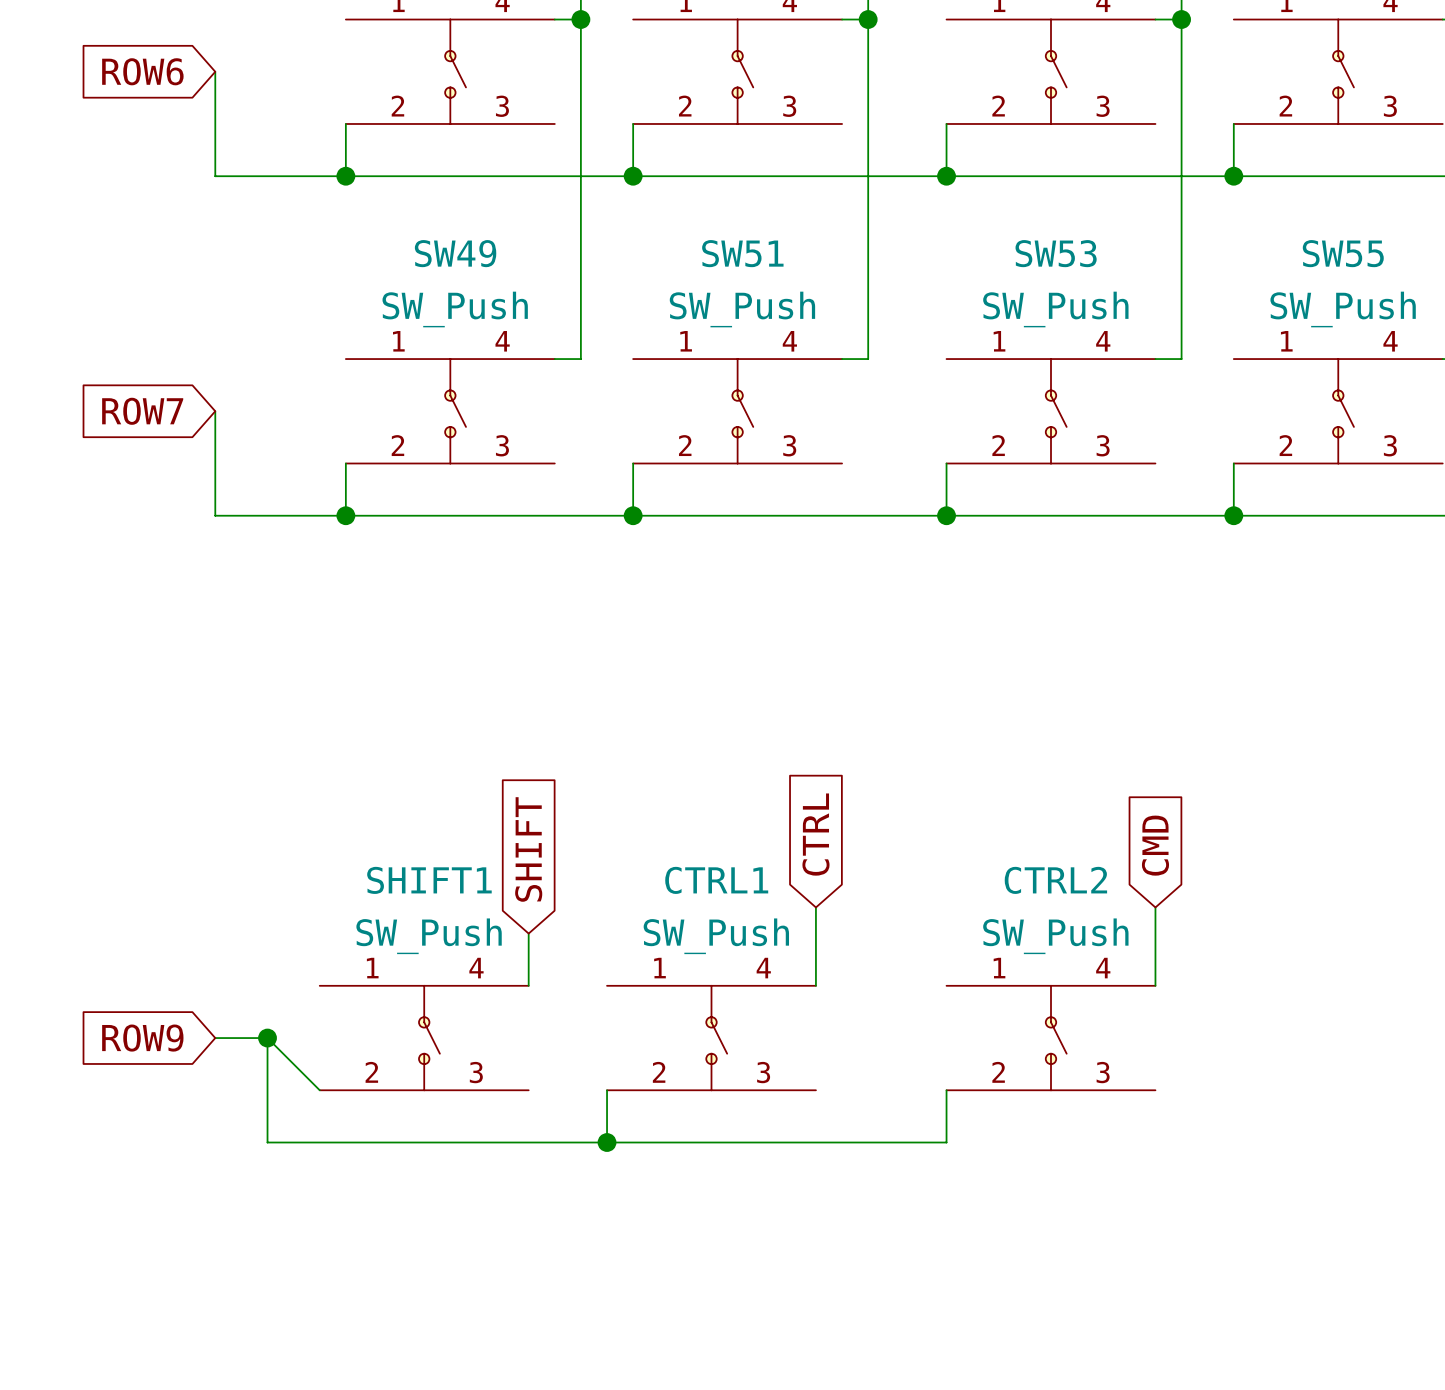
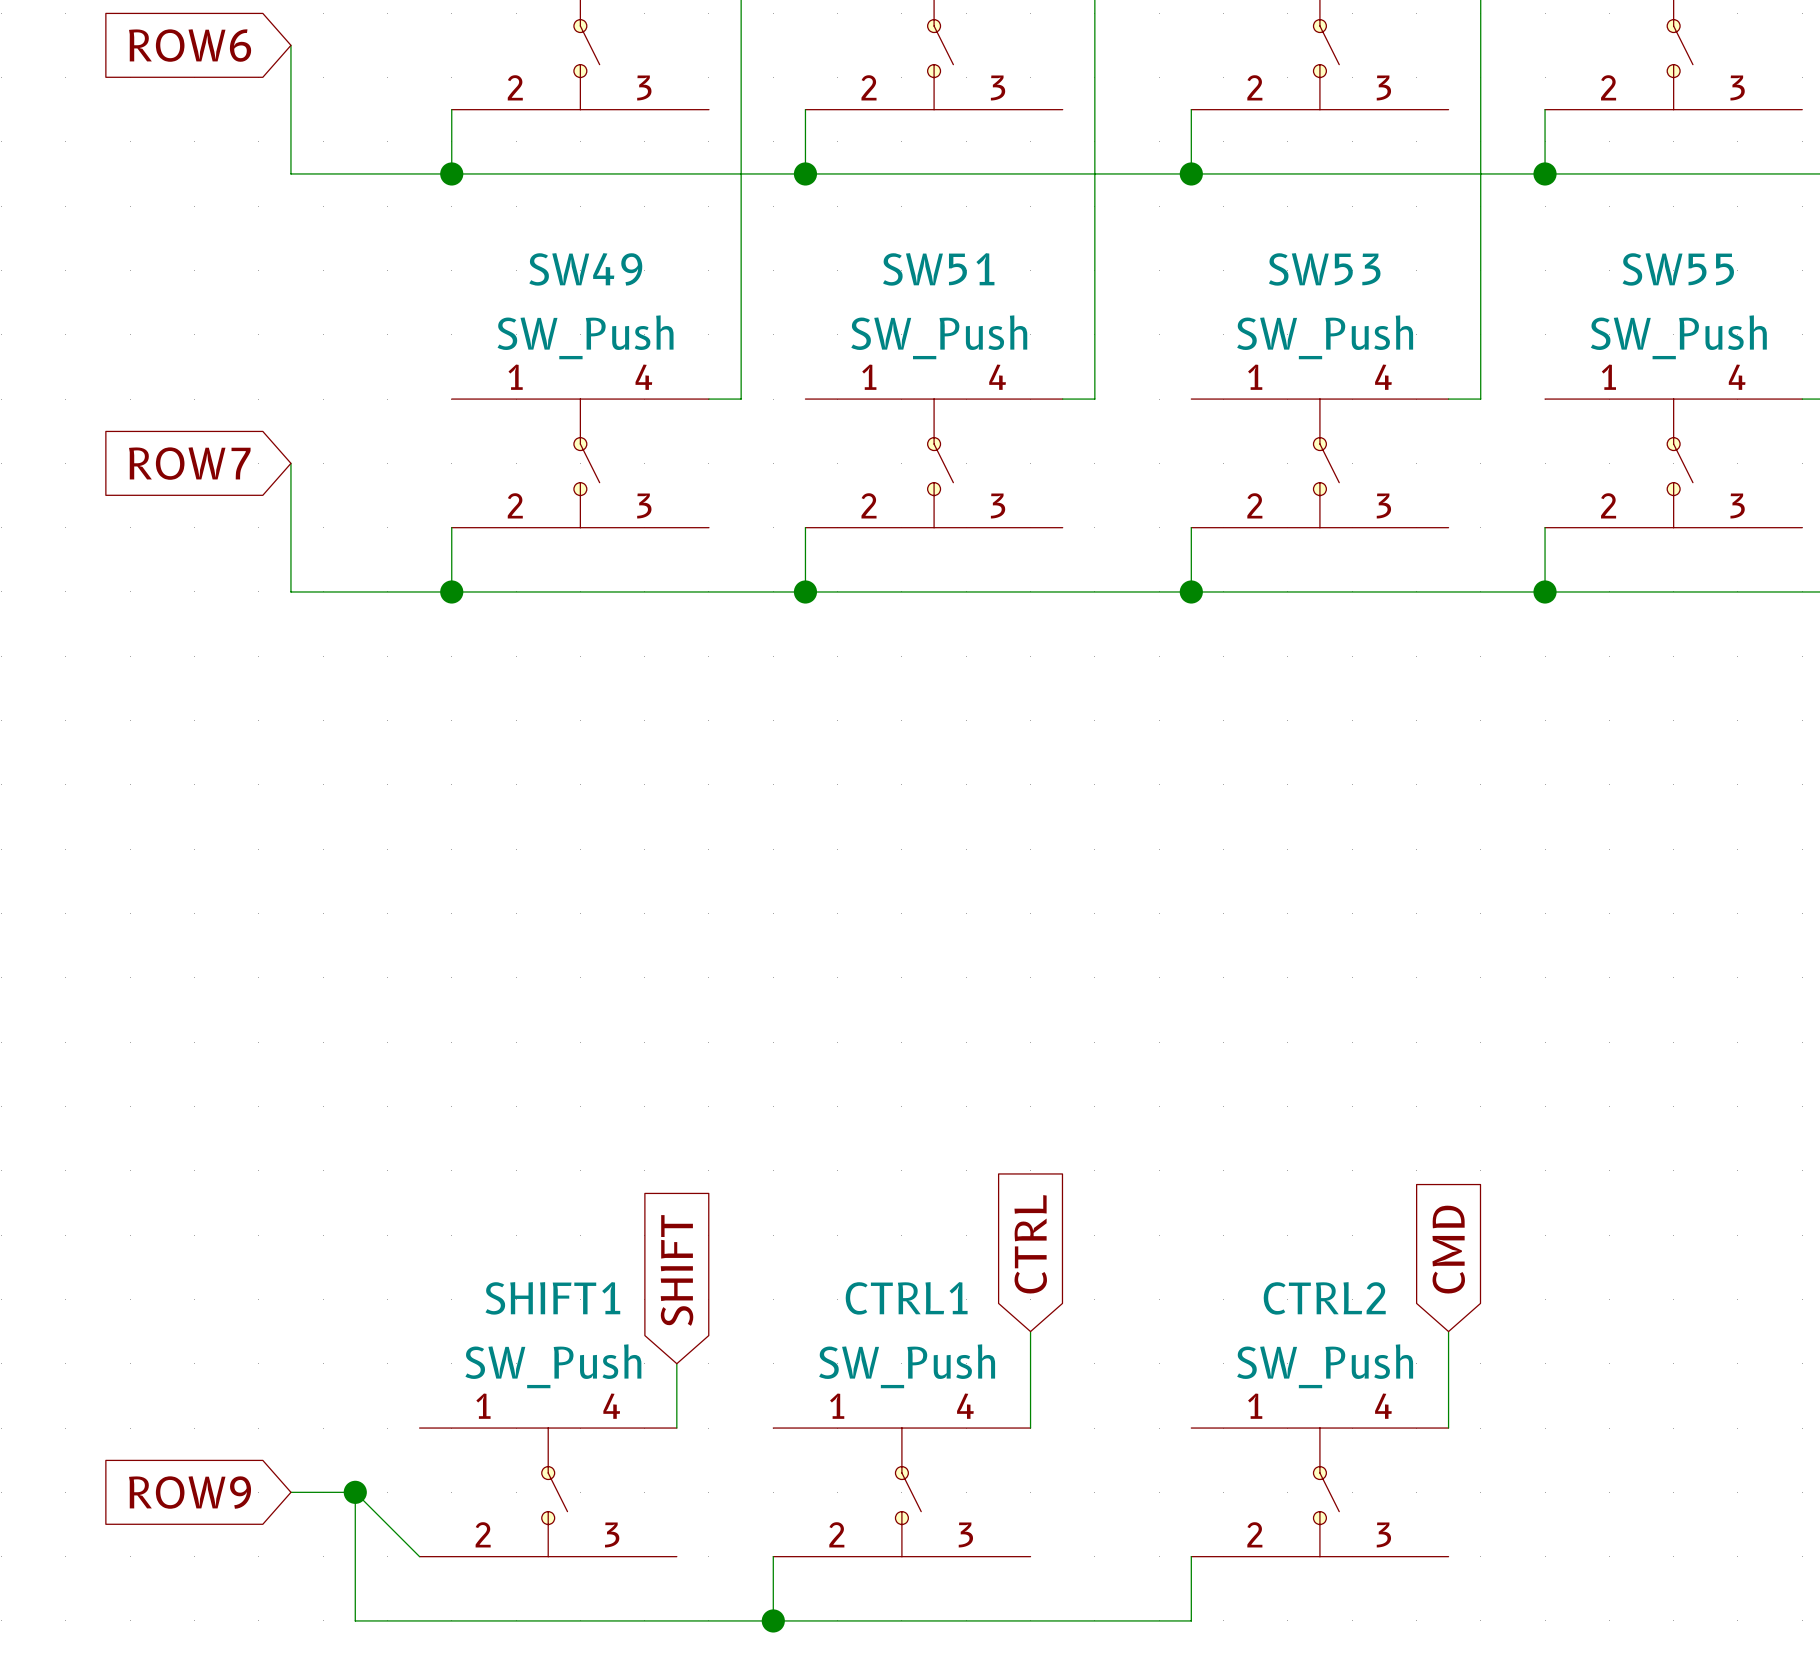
global label position: CTRL (815, 834) -> CTRL (1030, 1244)
global label position: CMD (1155, 845) -> CMD (1448, 1249)
global label position: SHIFT (528, 849) -> SHIFT (677, 1270)
wire: (815, 907) (815, 985) -> (1030, 1331) (1030, 1428)
wire: (1155, 907) (1155, 985) -> (1448, 1331) (1448, 1428)
wire: (528, 933) (528, 985) -> (676, 1363) (676, 1428)
global label position: ROW9 (142, 1038) -> ROW9 (190, 1492)
wire: (215, 1038) (267, 1038) -> (290, 1492) (355, 1492)
wire: (267, 1038) (267, 1142) (946, 1142) (946, 1090) -> (355, 1492) (355, 1620) (1191, 1620) (1191, 1556)
wire: (267, 1038) (319, 1090) -> (355, 1492) (419, 1556)
junction: (267, 1038) -> none
SHIFT1 position: (424, 1038) -> (548, 1492)
CTRL1 position: (711, 1038) -> (901, 1492)
CTRL2 position: (1051, 1038) -> (1319, 1492)
wire: (607, 1090) (607, 1142) -> (773, 1556) (773, 1620)
junction: (607, 1142) -> none
junction: none -> (355, 1492)
junction: none -> (773, 1620)

